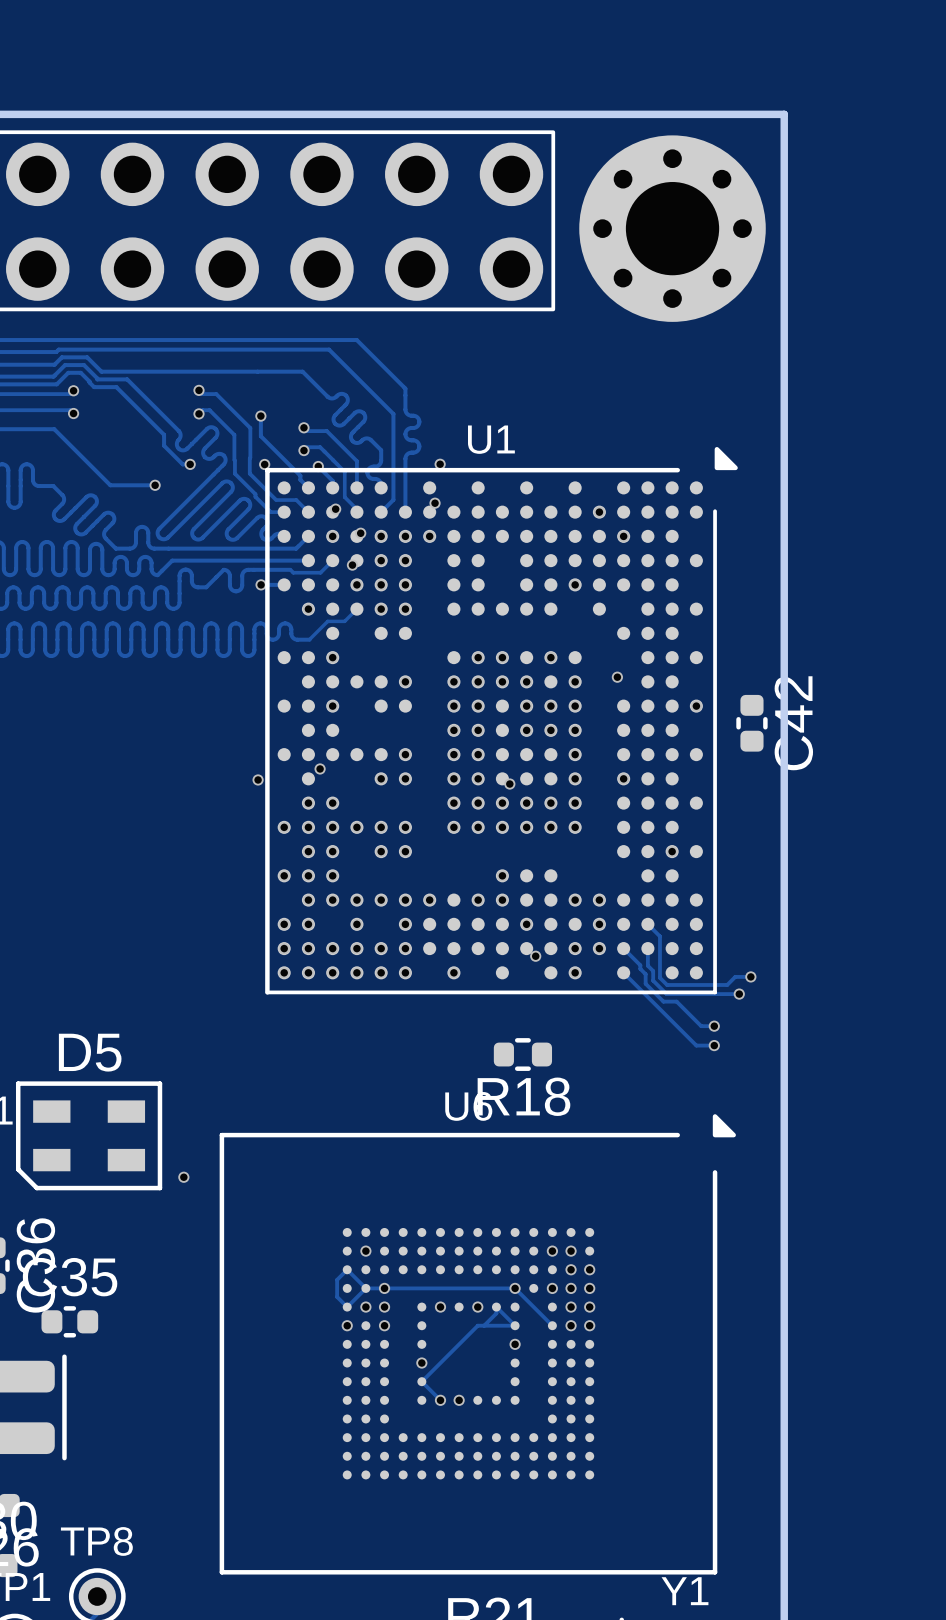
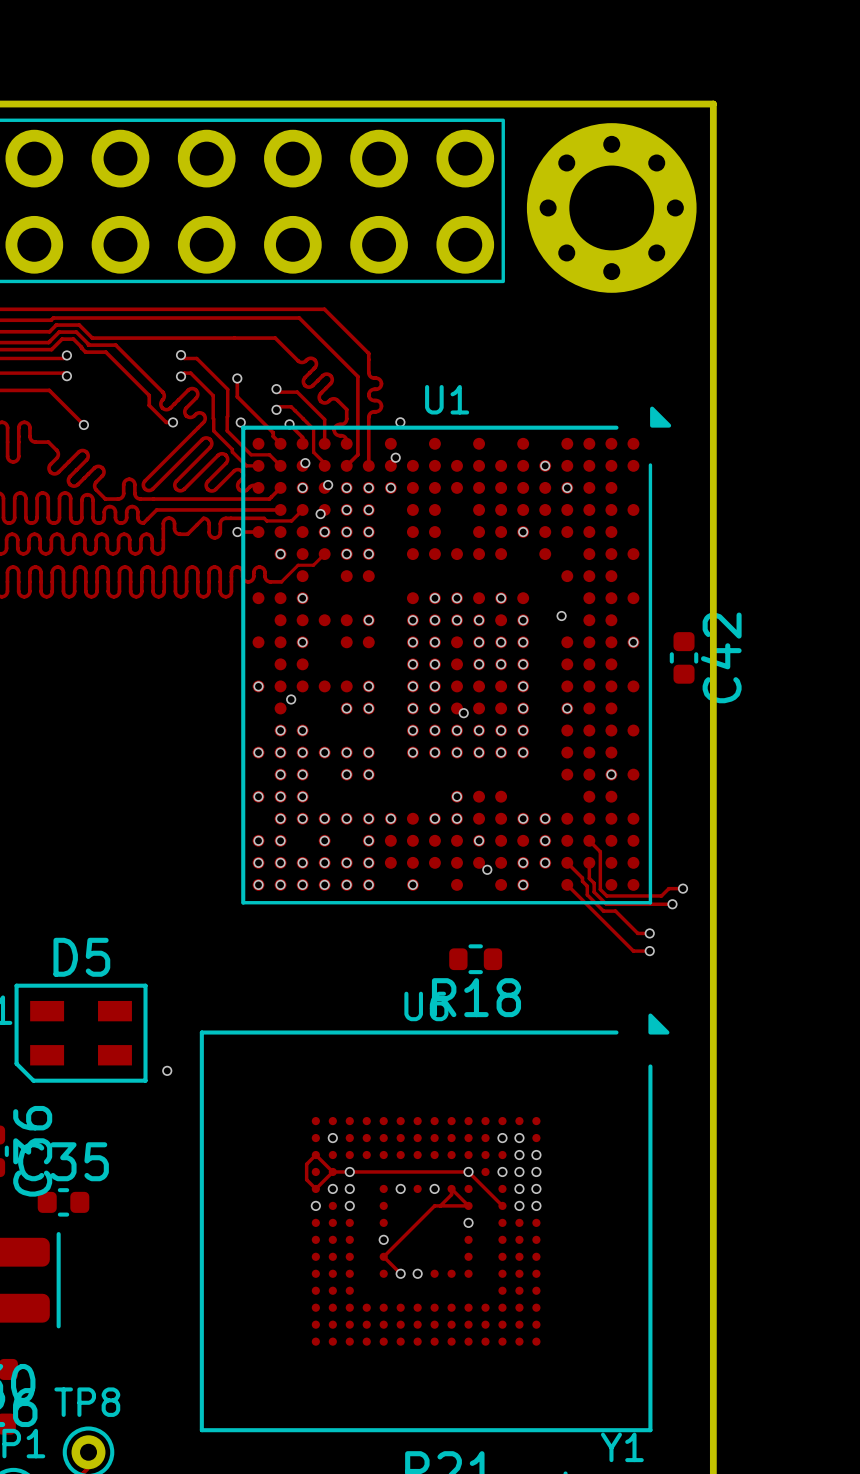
track: (92, 467) (110, 485) (155, 485) -> none
via position: (155, 485) -> (83, 424)
via position: (258, 779) -> (258, 686)

